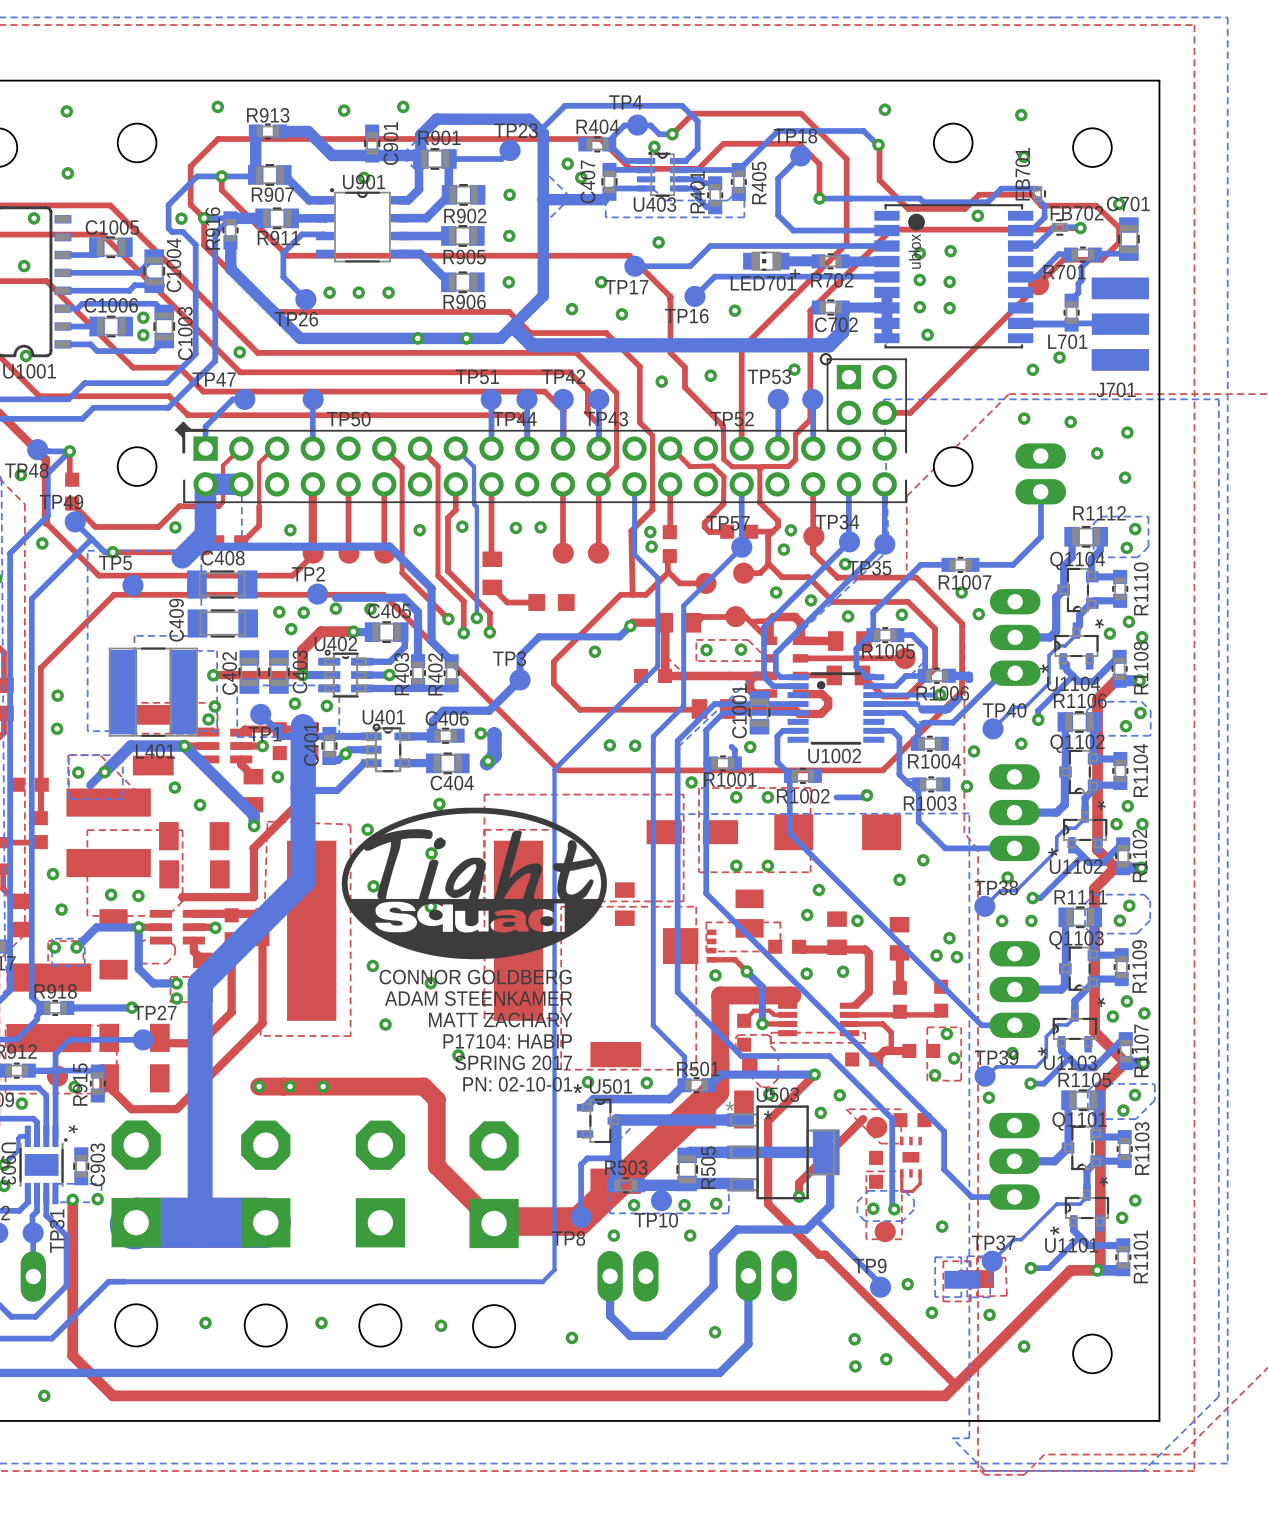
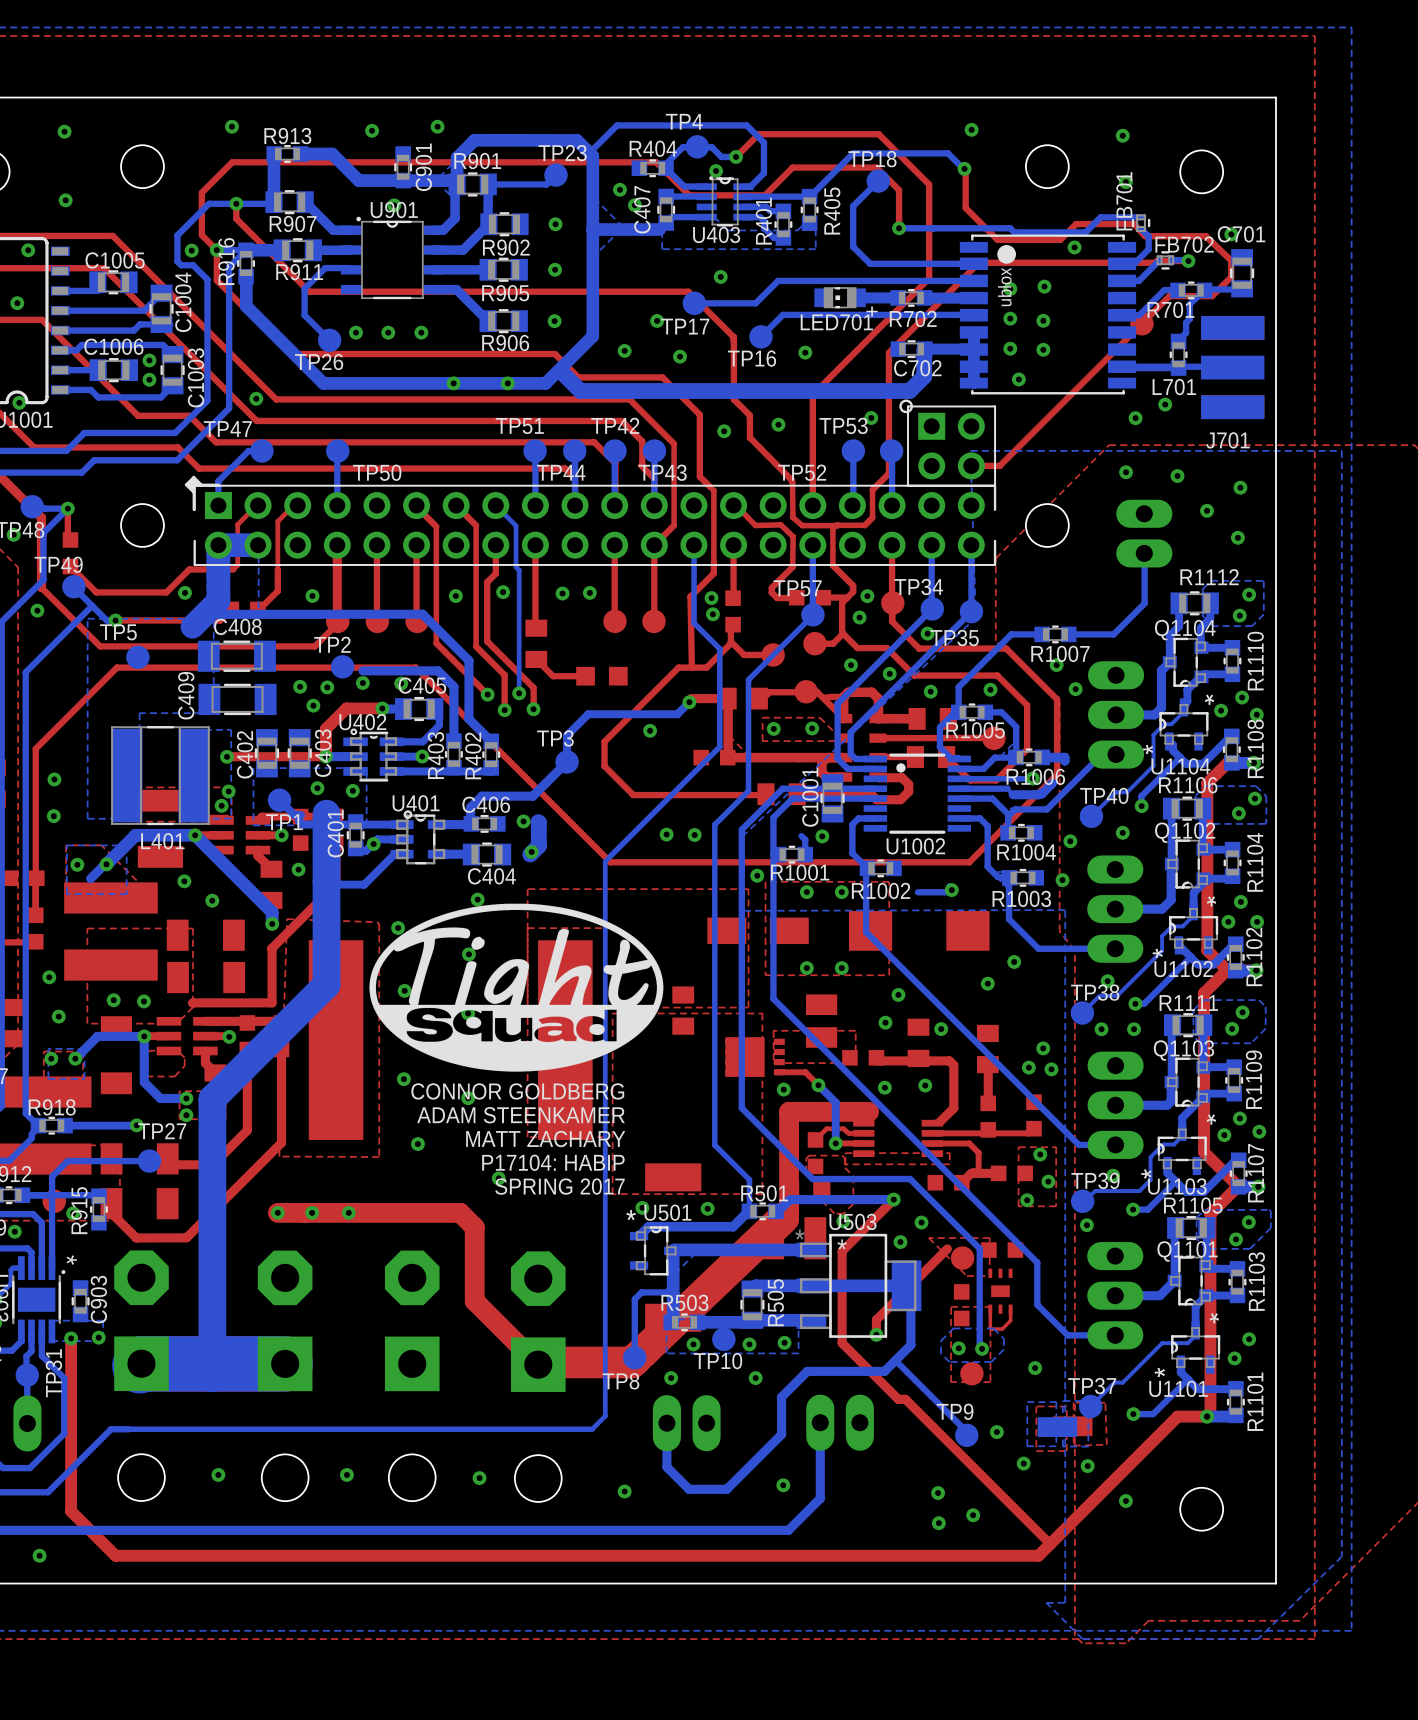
text: PN: 02-10-01 (517, 1084) -> none

